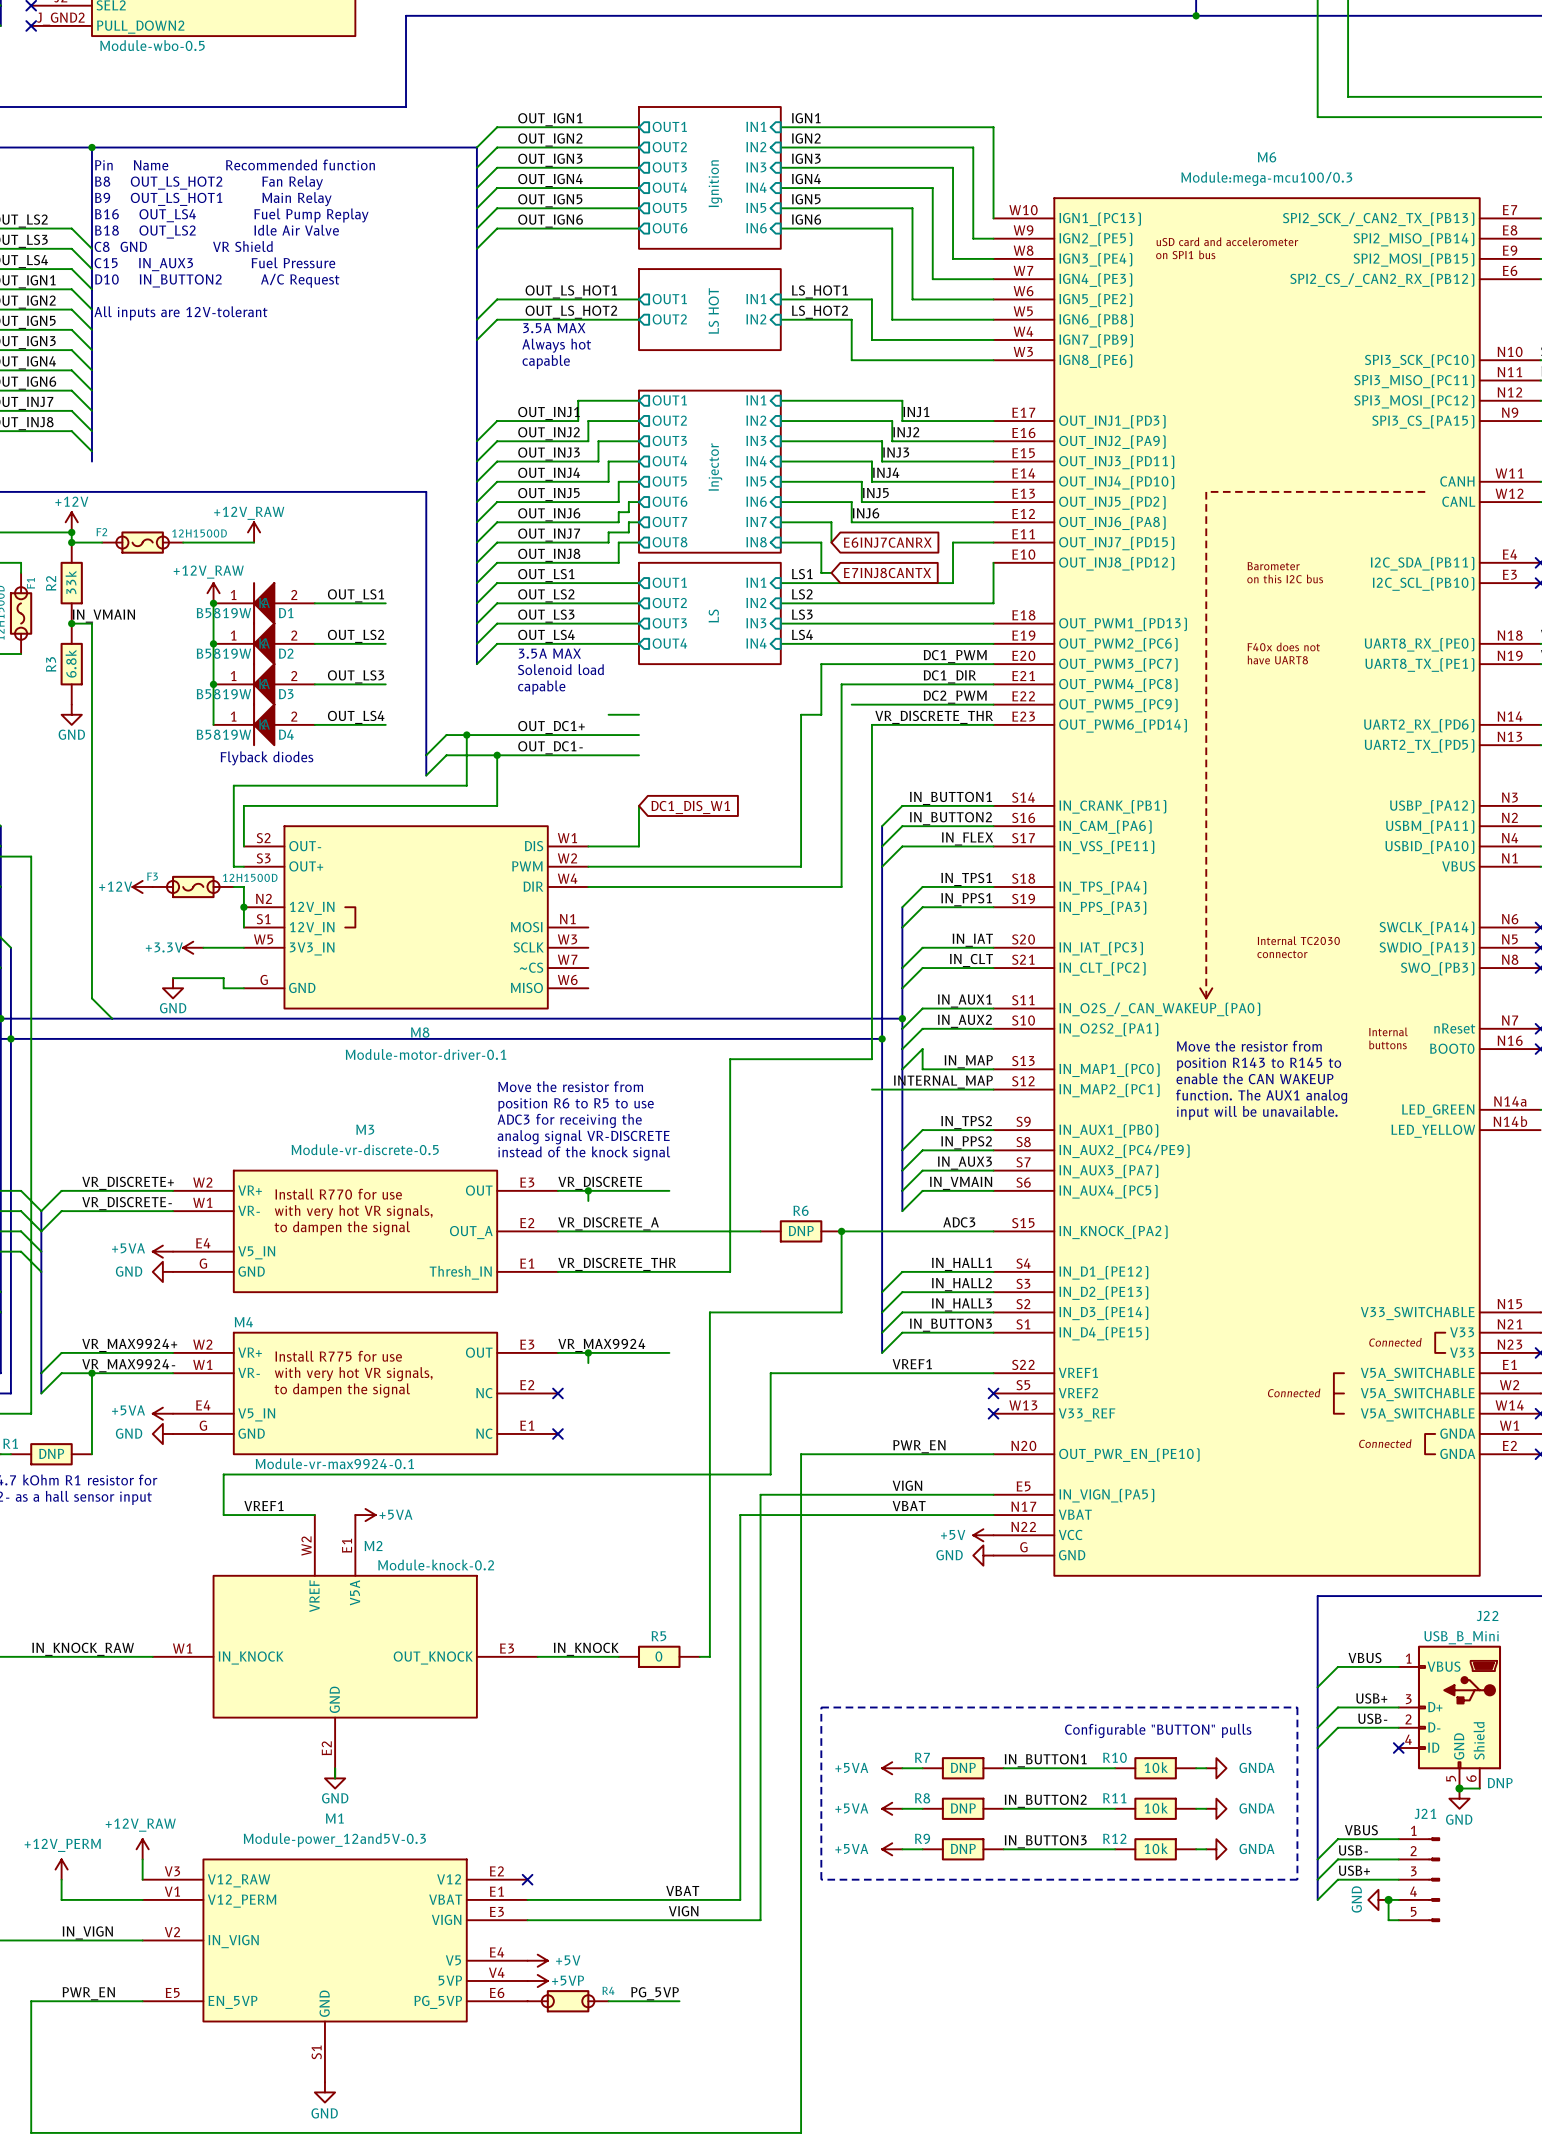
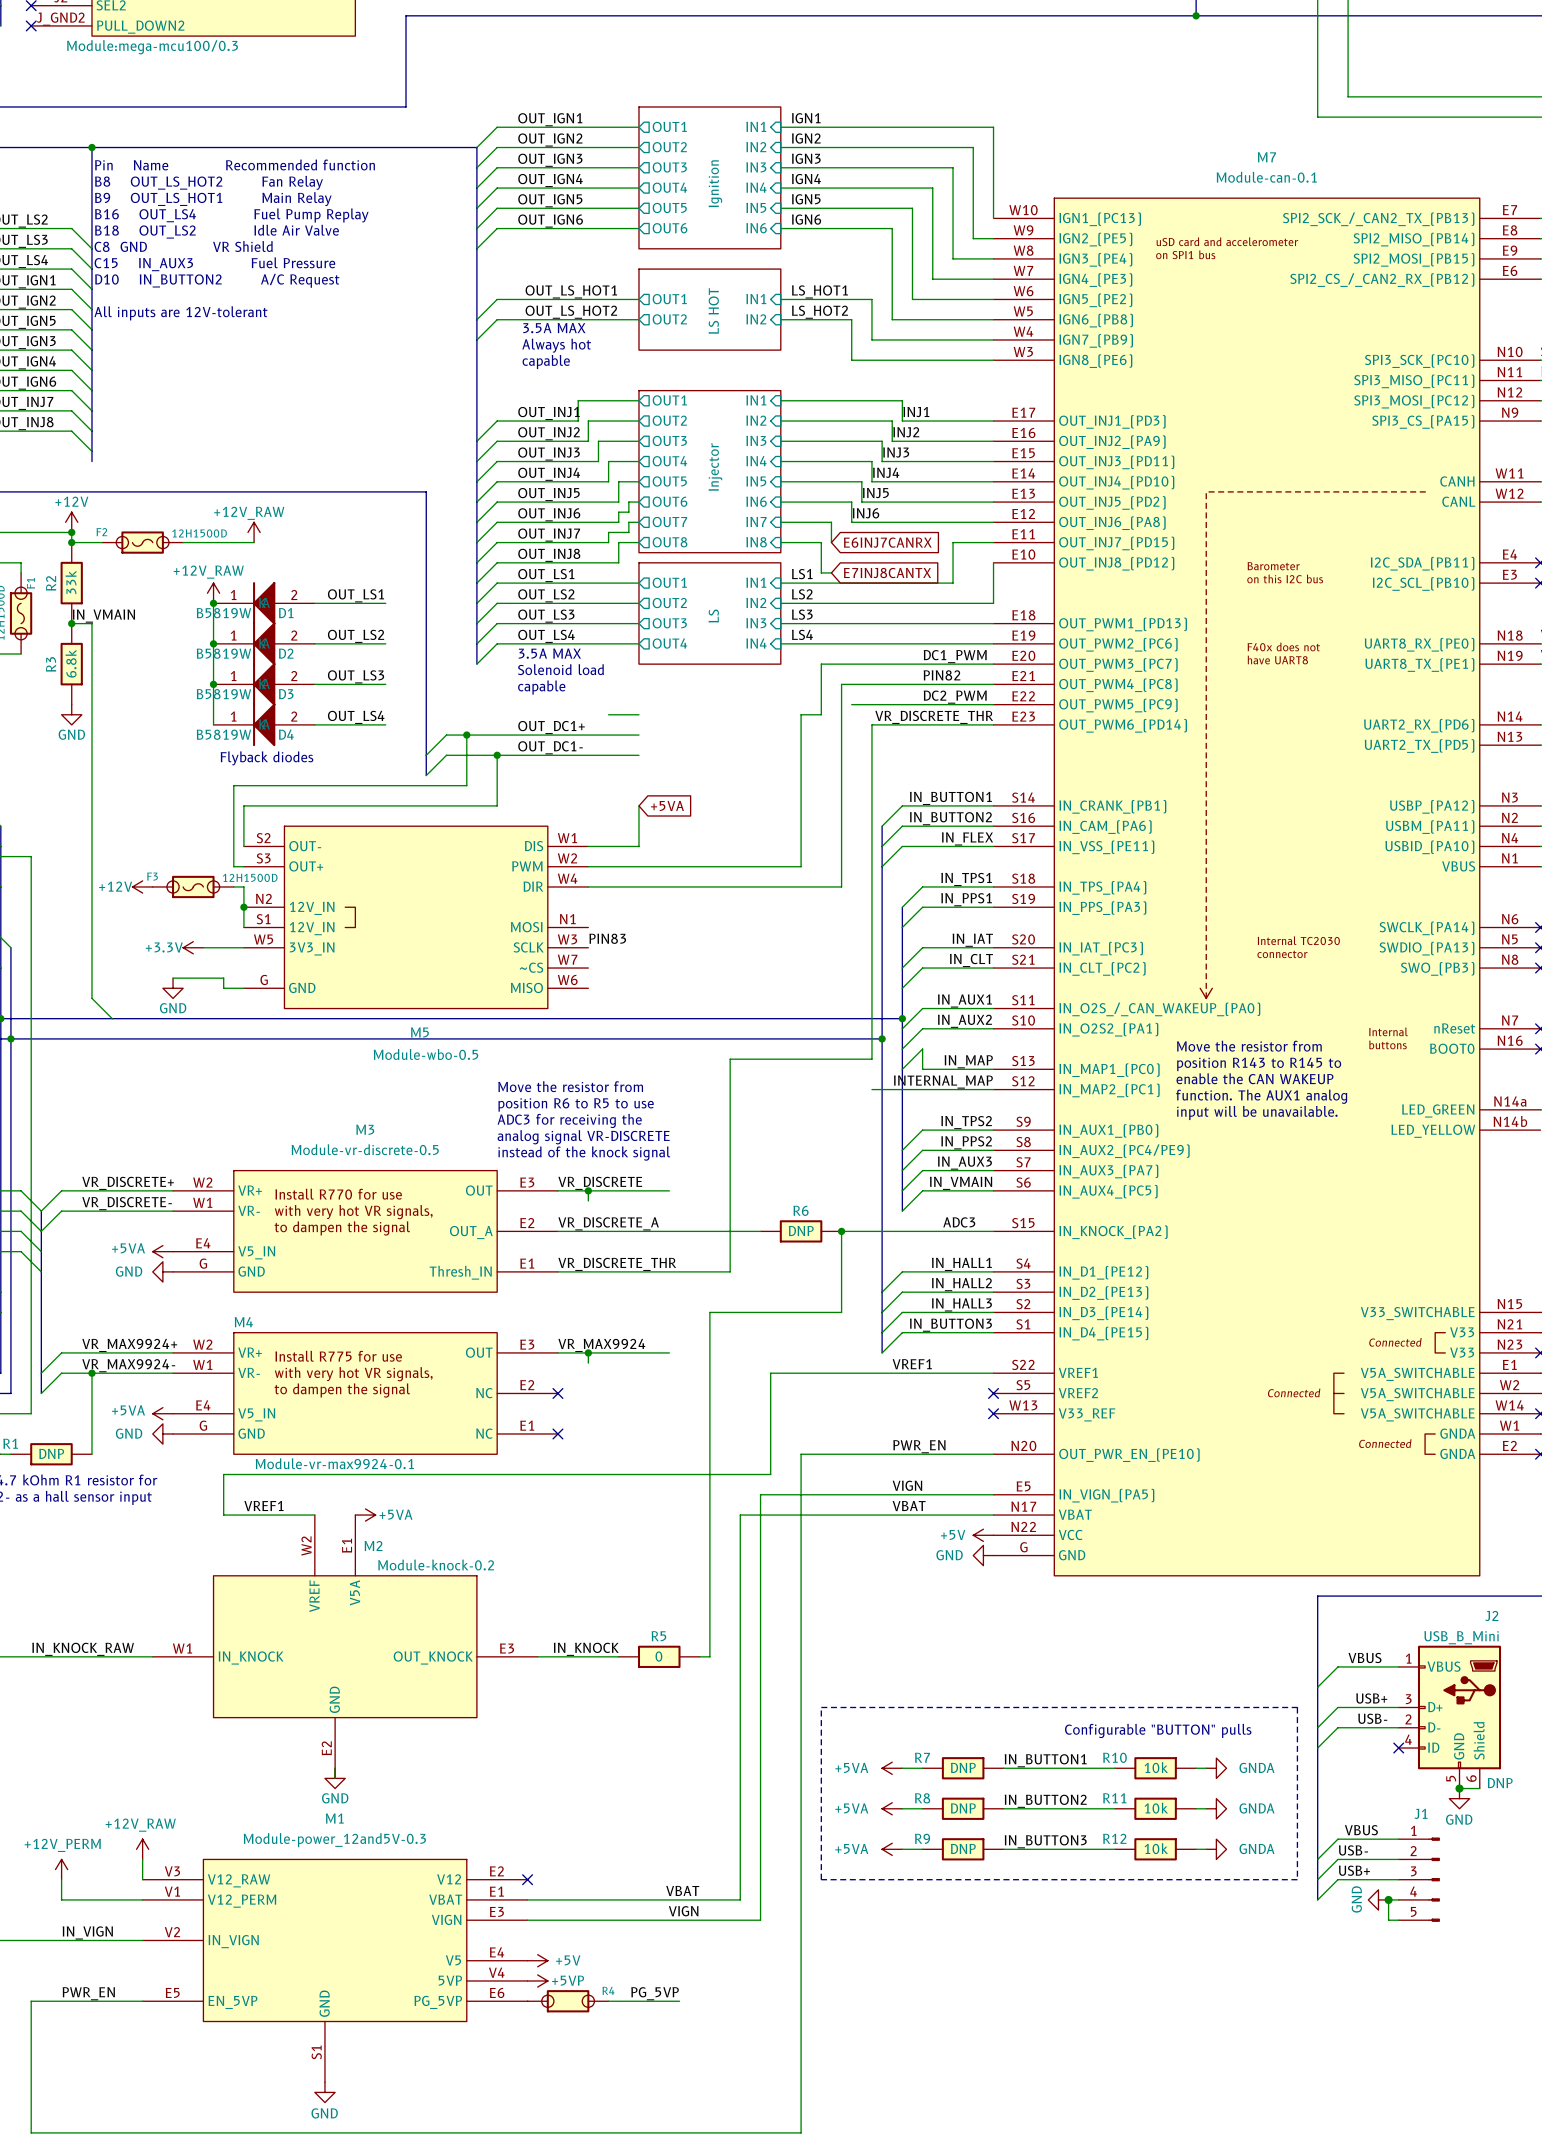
part value: Module-wbo-0.5 (152, 45) -> Module:mega-mcu100/0.3 (152, 47)
M6 name: M6 (1267, 157) -> M7 (1266, 157)
M6 value: Module:mega-mcu100/0.3 (1266, 178) -> Module-can-0.1 (1266, 177)
label: DC1_DIR (949, 676) -> PIN82 (941, 675)
global label: DC1_DIS_W1 (690, 807) -> +5VA (667, 806)
label: none -> PIN83 (607, 938)
M8 name: M8 (420, 1032) -> M5 (419, 1032)
M8 value: Module-motor-driver-0.1 (426, 1054) -> Module-wbo-0.5 (426, 1054)
J22 name: J22 (1487, 1616) -> J2 (1491, 1616)
J21 name: J21 (1425, 1813) -> J1 (1421, 1813)

